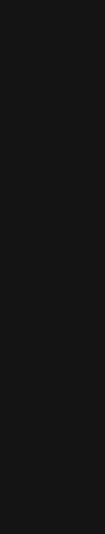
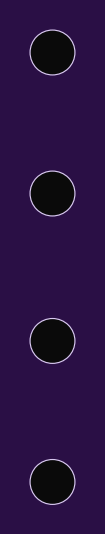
part: none -> (52, 52)
part: none -> (52, 193)
part: none -> (52, 340)
part: none -> (52, 481)

